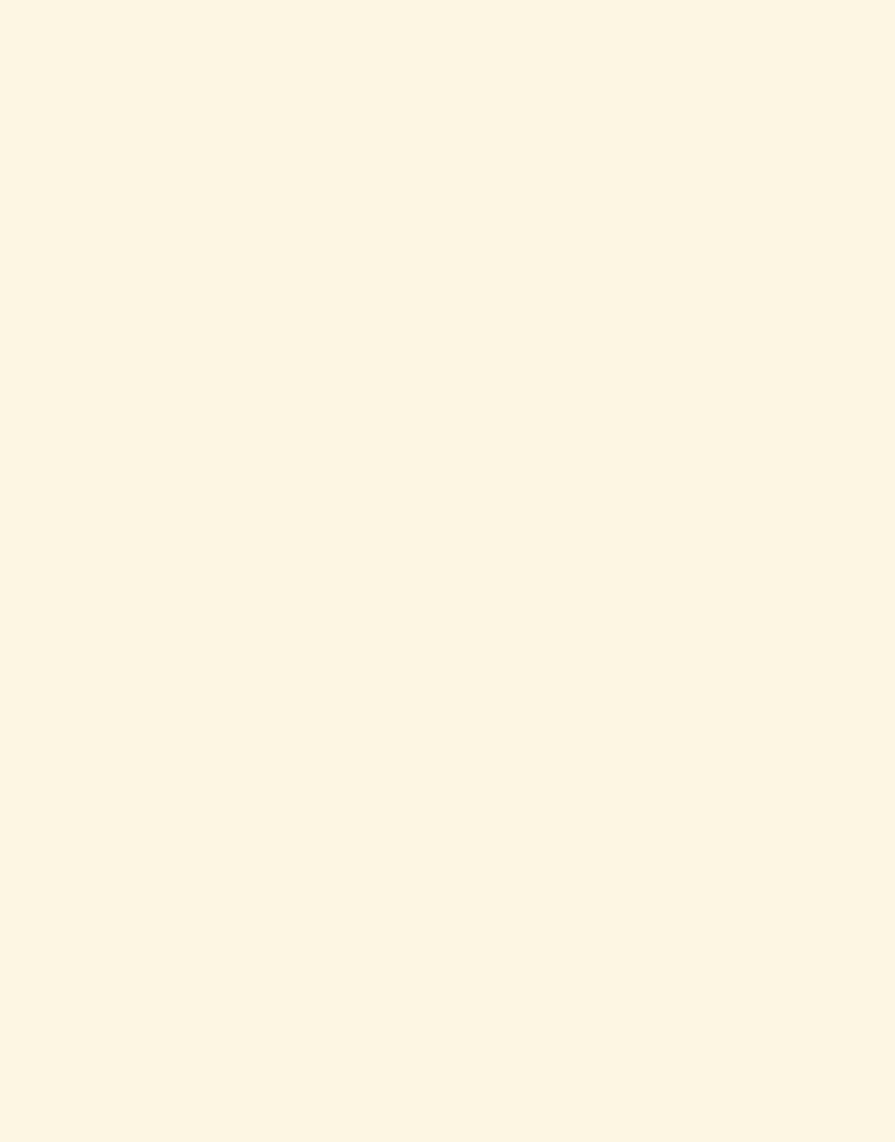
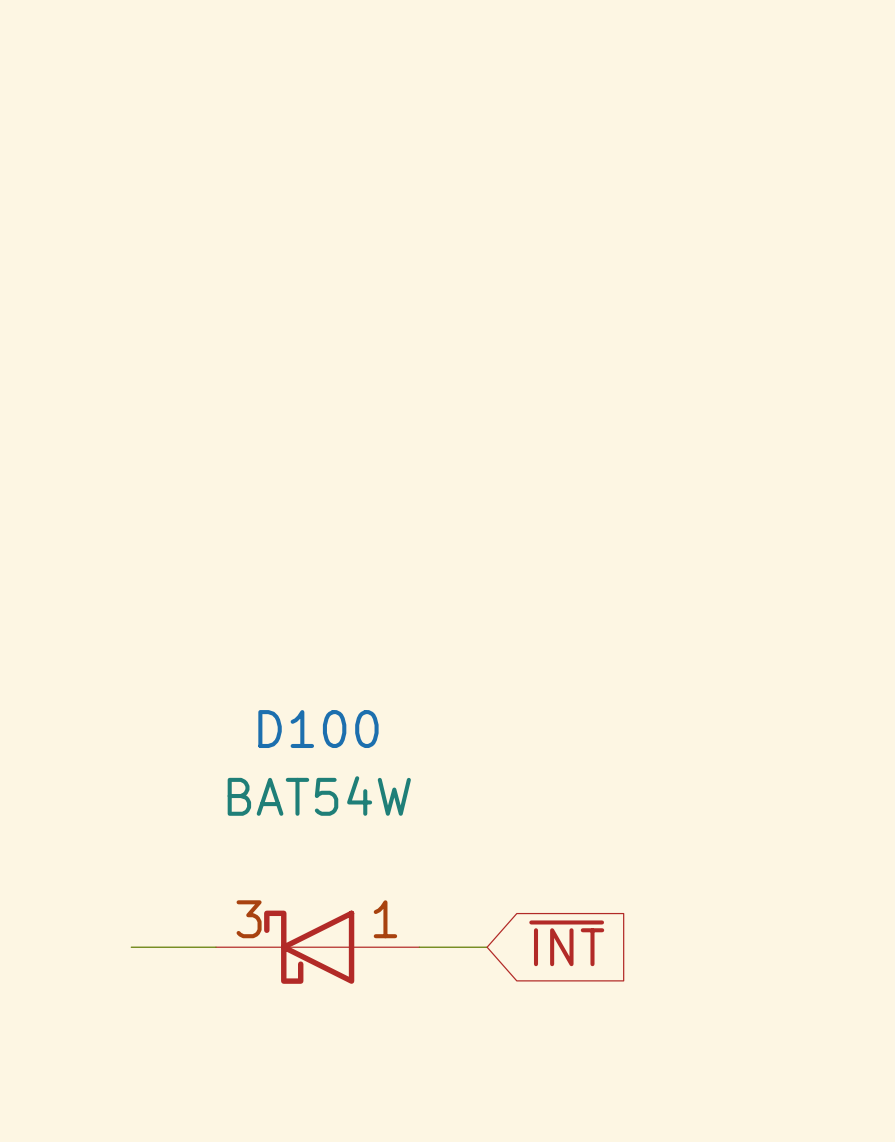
global label: none -> ~{INT} (566, 943)
wire: none -> (131, 947) (215, 947)
D100: none -> BAT54W (317, 947)
wire: none -> (419, 947) (487, 947)

